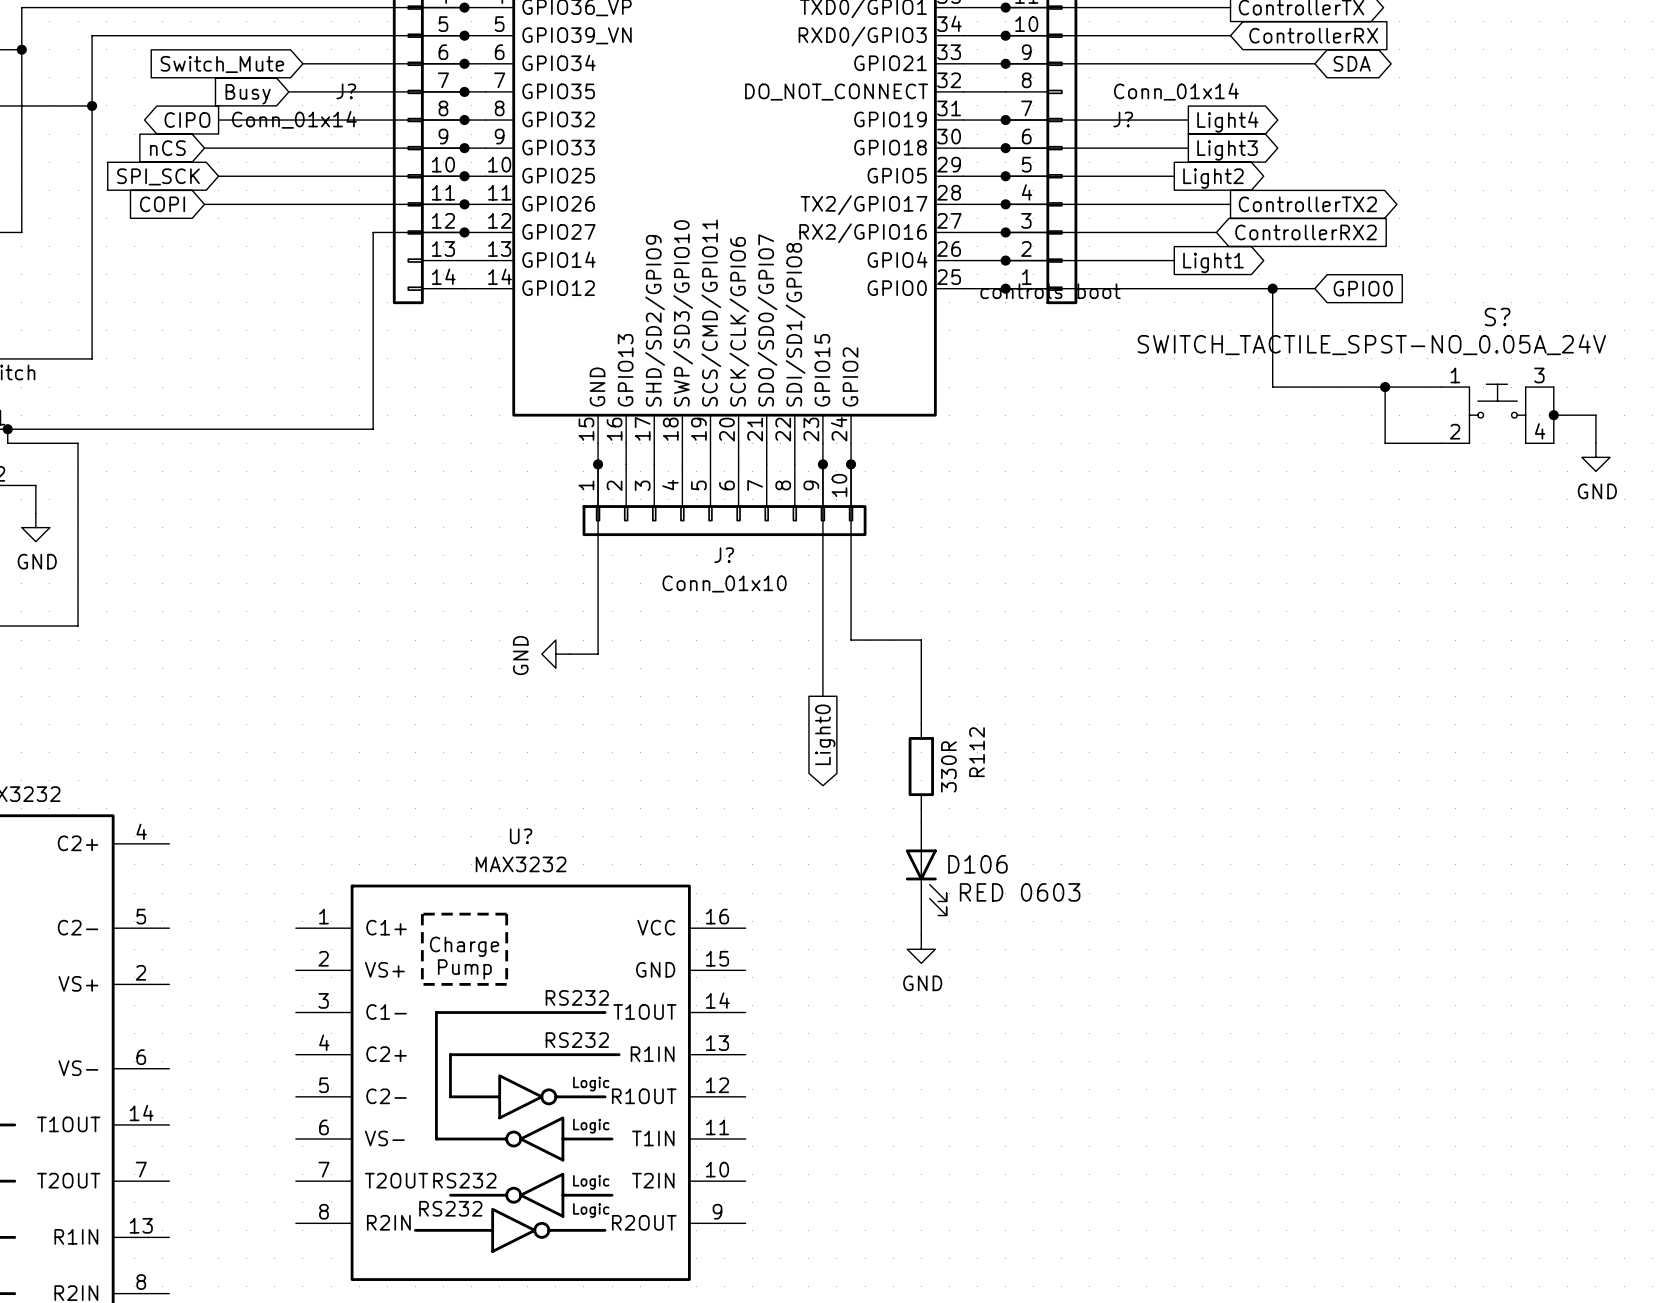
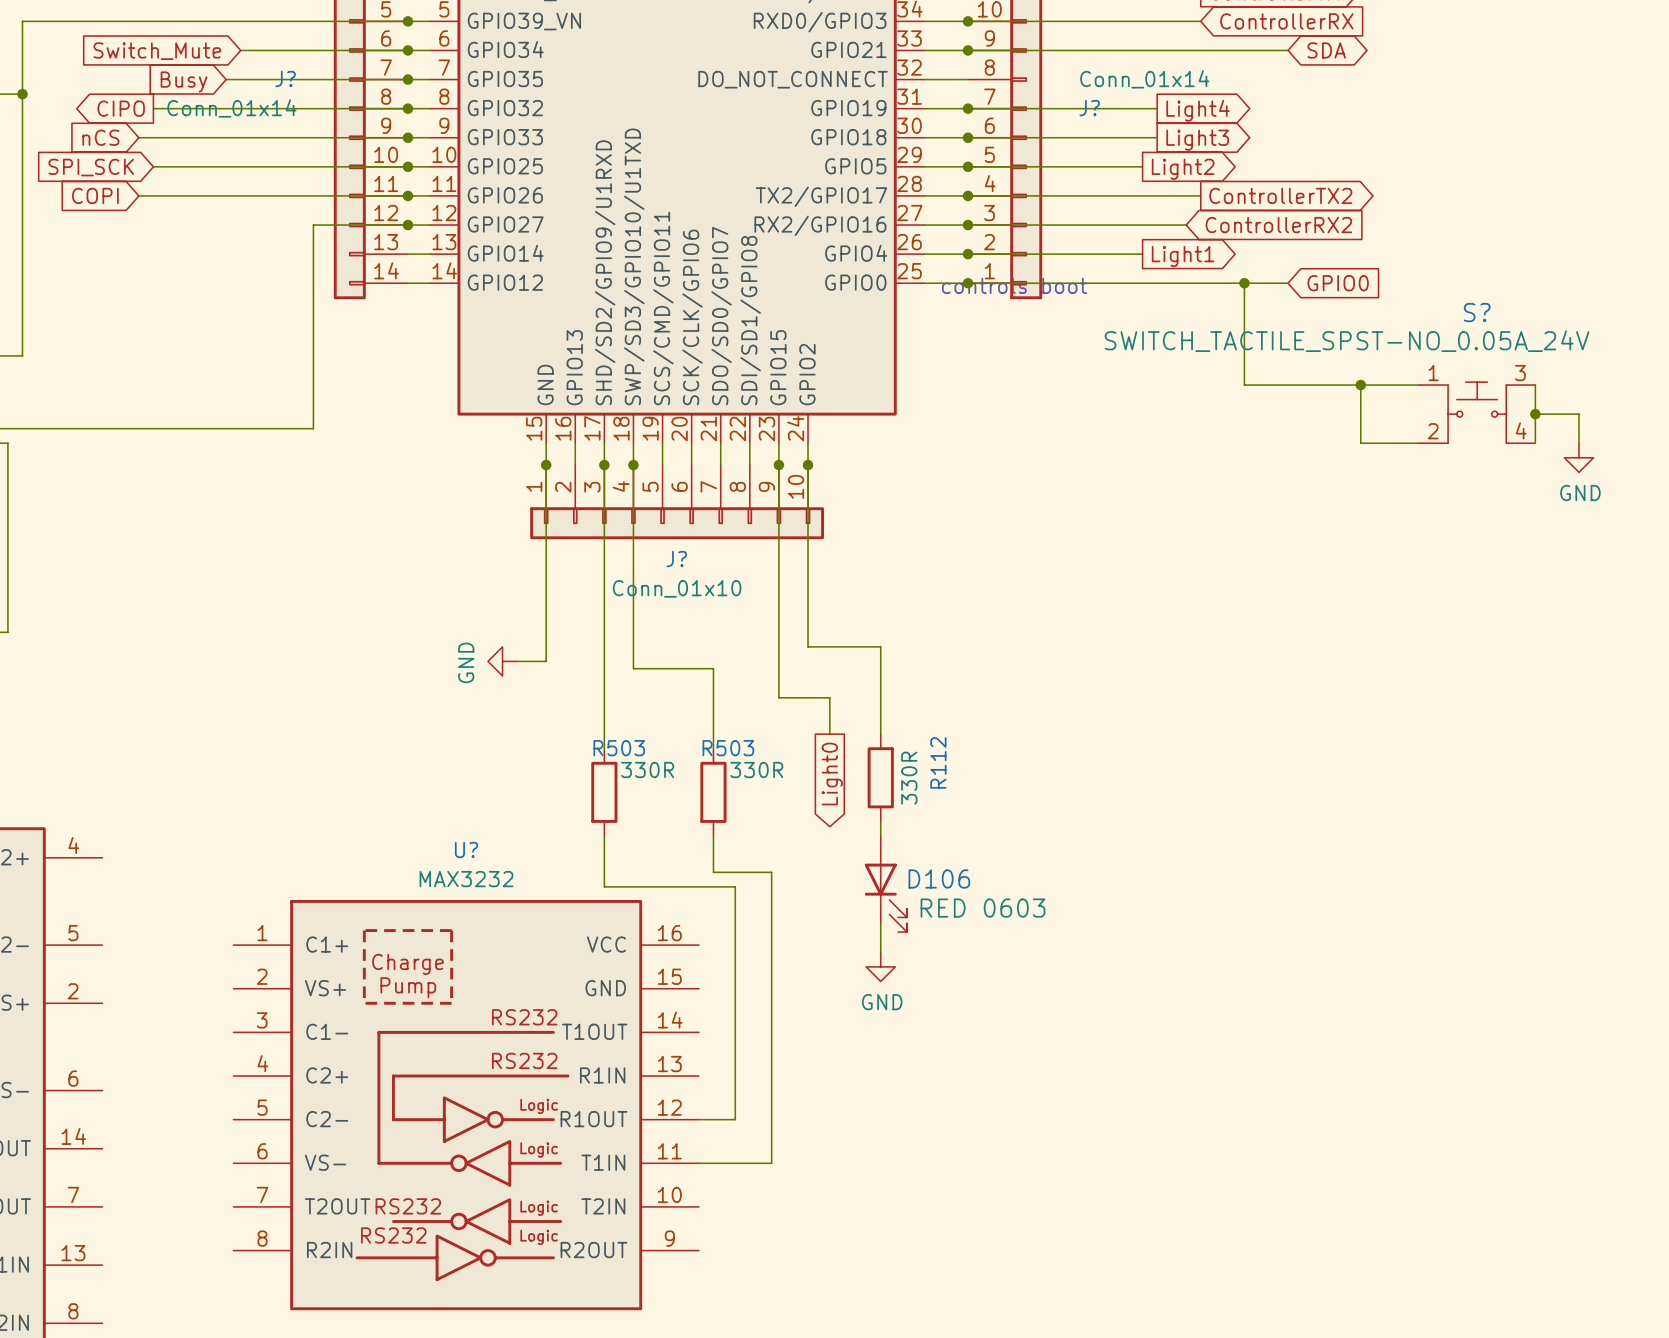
part pin name: SWP/SD3/GPIO10 (683, 313) -> SWP/SD3/GPIO10/U1TXD (634, 266)
part pin name: SHD/SD2/GPIO9 (655, 320) -> SHD/SD2/GPIO9/U1RXD (605, 272)
wire: none -> (604, 465) (604, 748)
junction: none -> (604, 465)
wire: none -> (633, 465) (633, 668) (713, 668) (713, 748)
junction: none -> (633, 465)
wire: (822, 689) (822, 696) -> (778, 697) (829, 697) (829, 734)
global label position: Light0 (825, 734) -> Light0 (832, 774)
R503: none -> 330R (604, 792)
R503: none -> 330R (713, 792)
wire: none -> (604, 835) (604, 886) (735, 886) (735, 1119) (698, 1119)
wire: none -> (713, 835) (713, 872) (771, 872) (771, 1163) (698, 1163)

